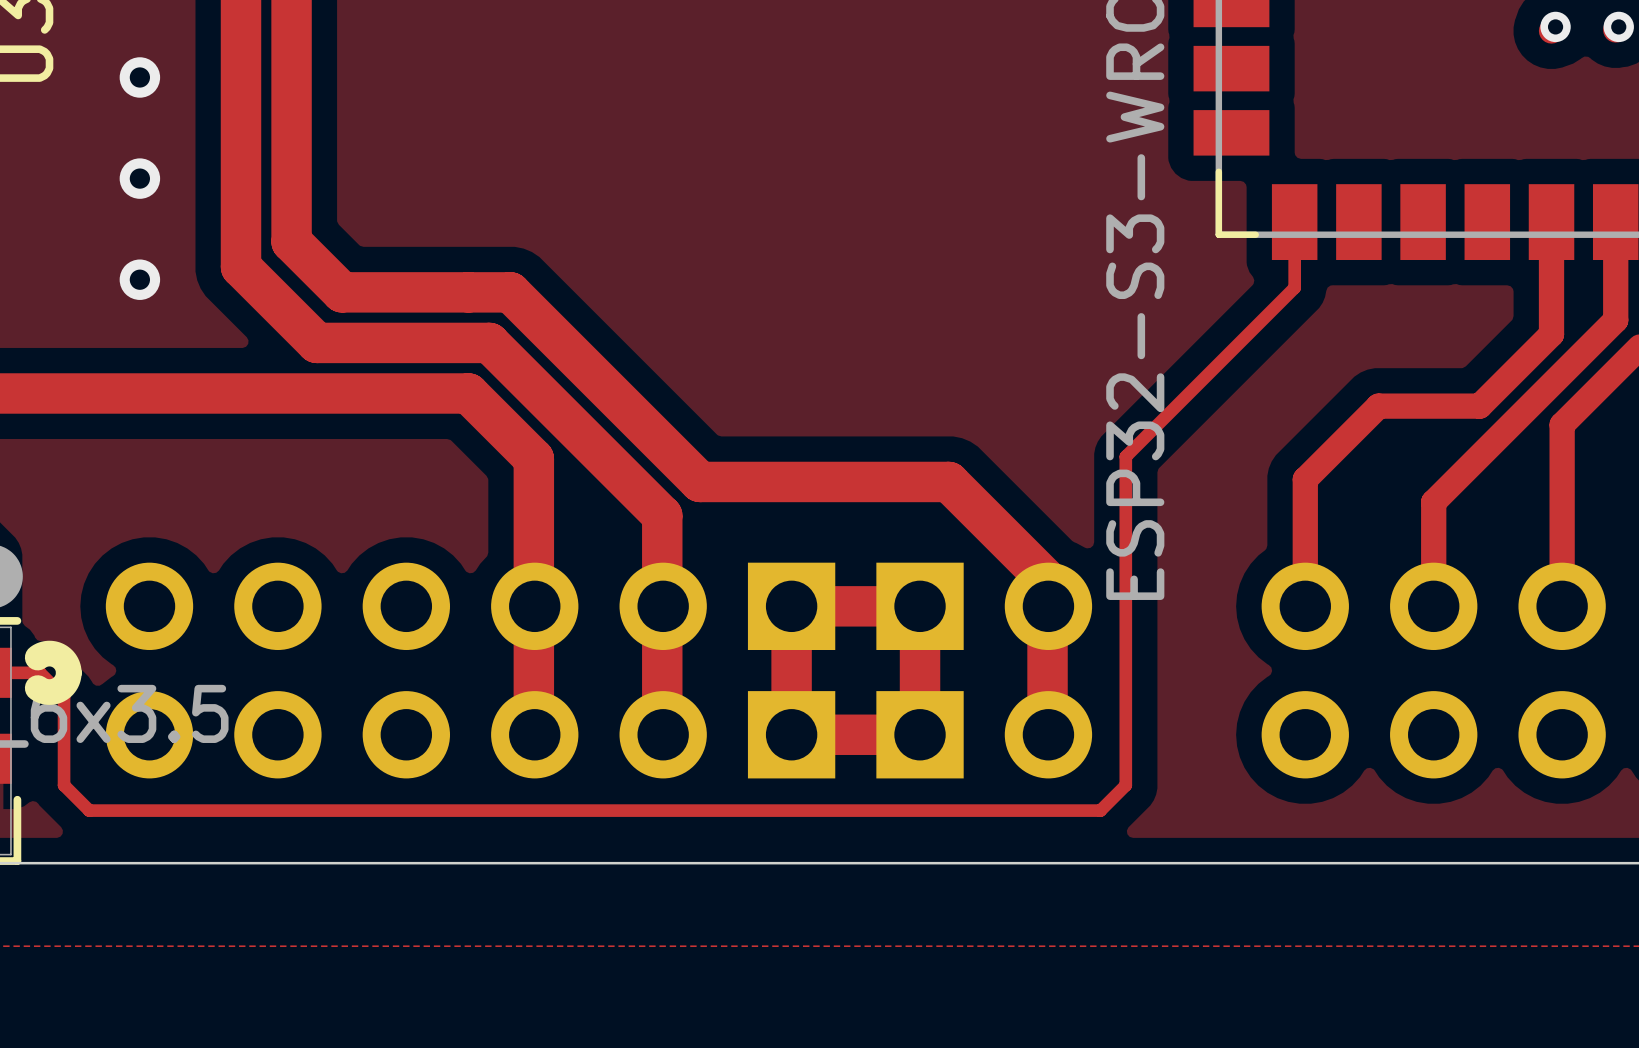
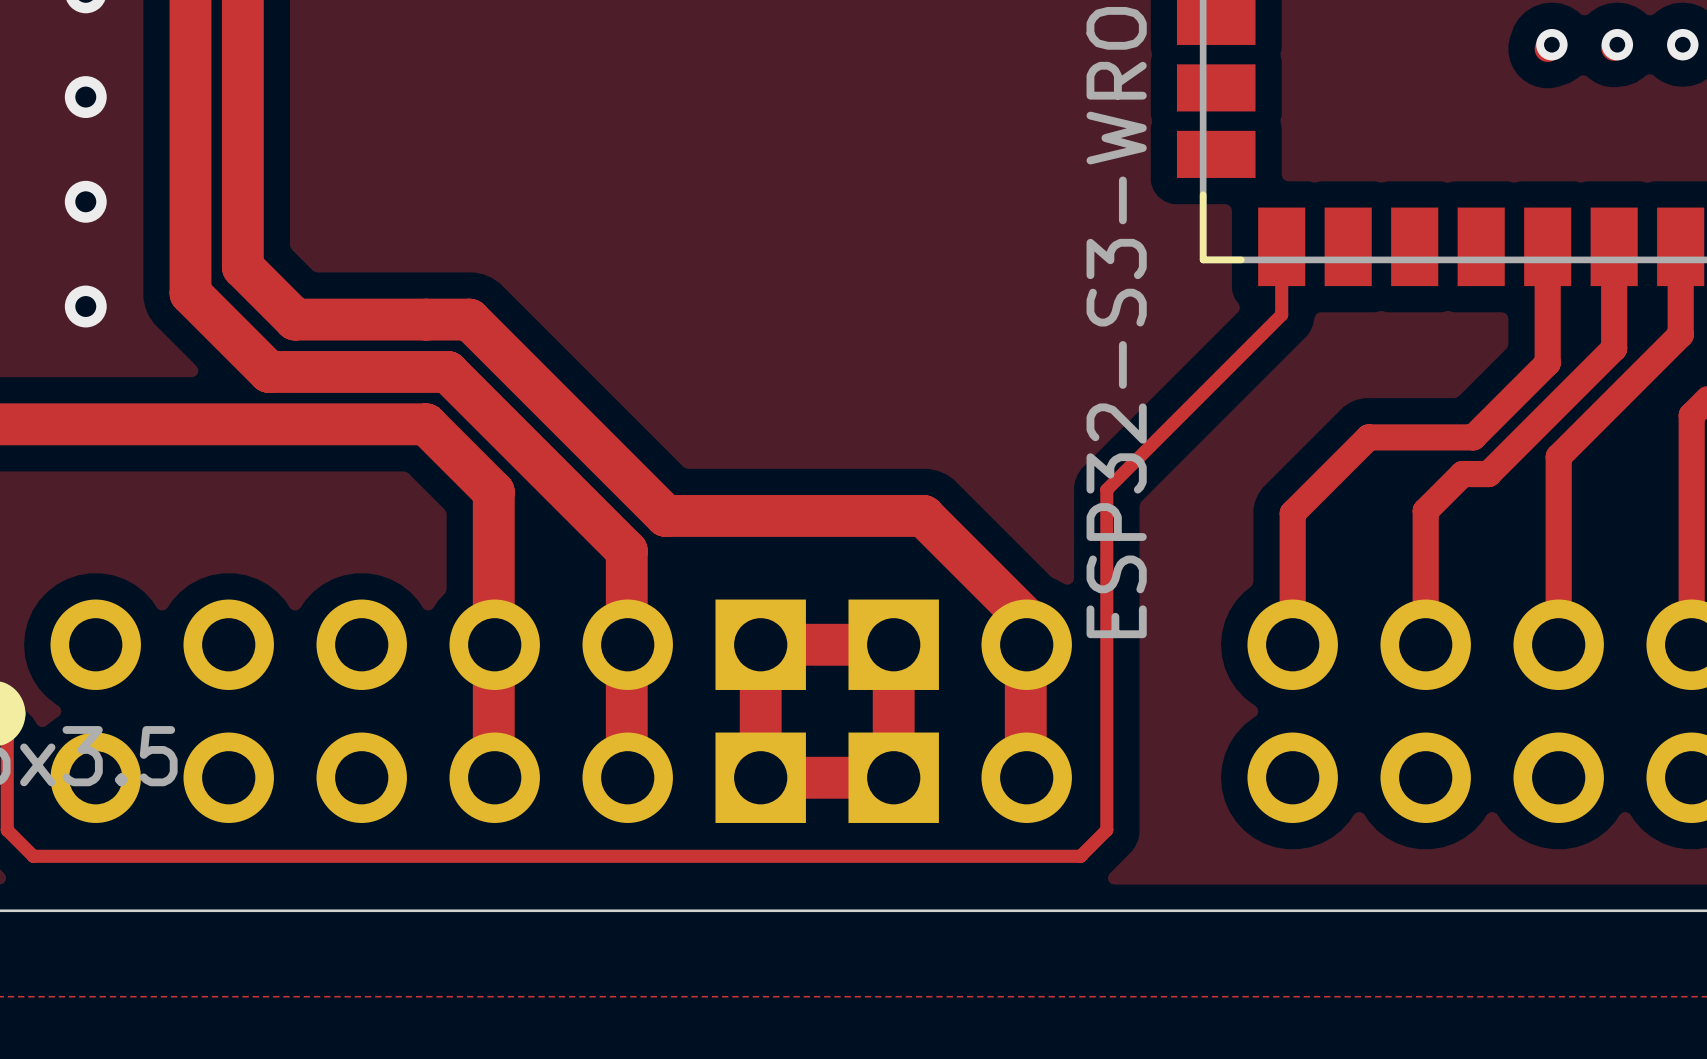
track: (1494, 441) (1433, 502) -> (1488, 474) (1462, 474) (1425, 510) (1425, 536)

